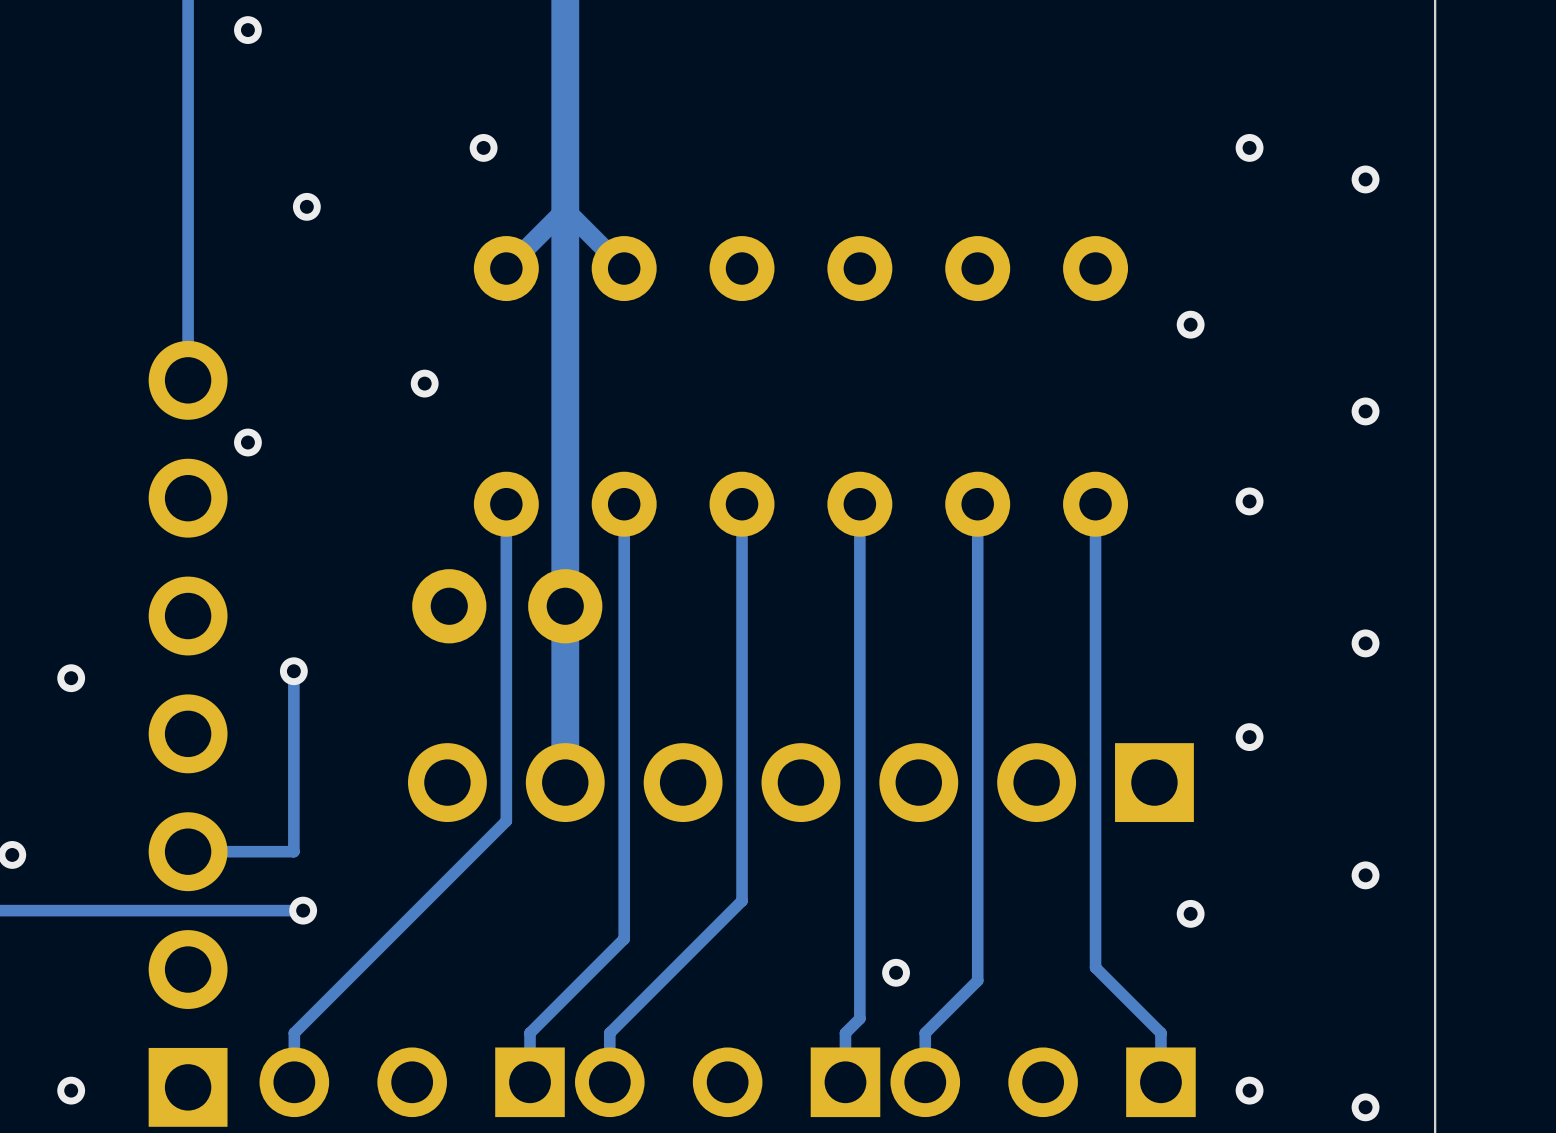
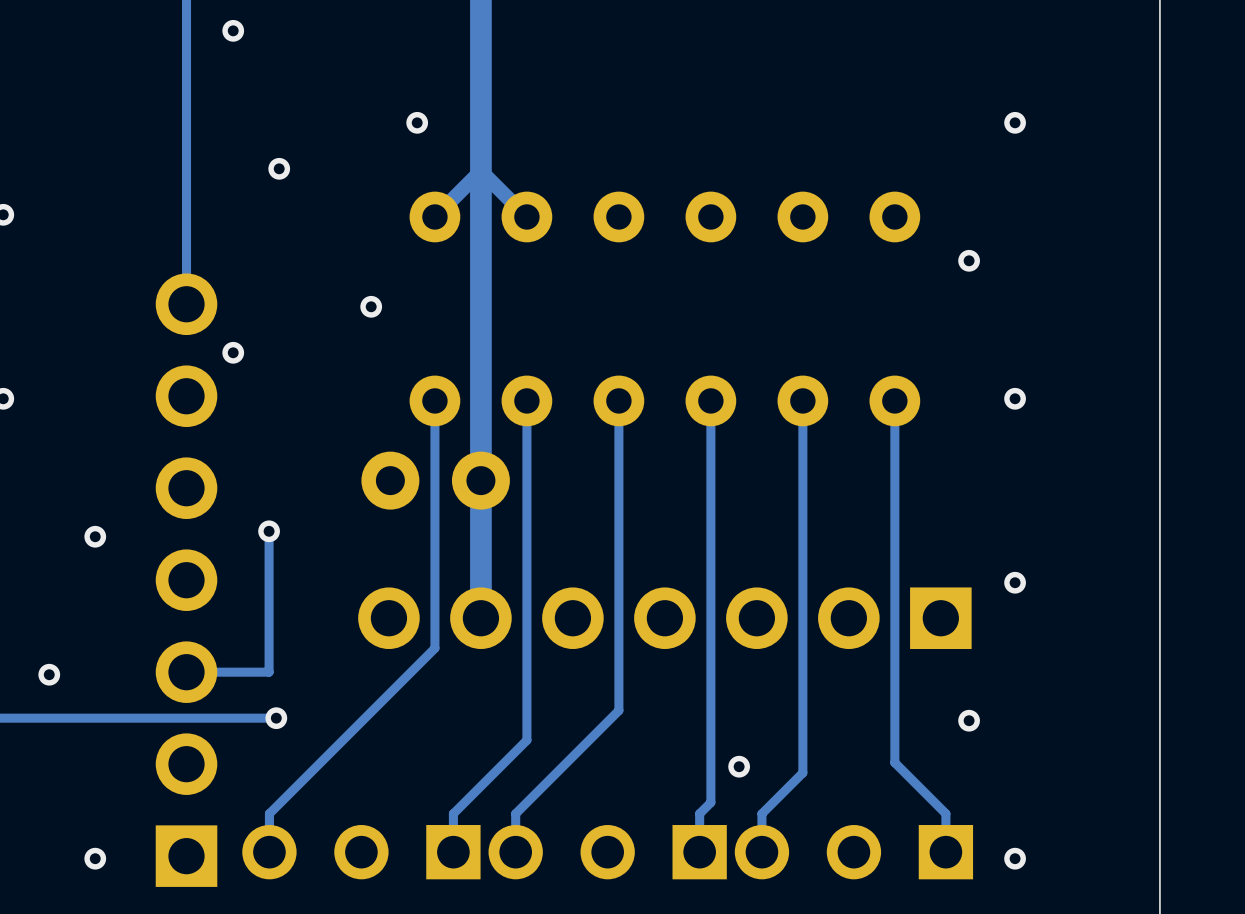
via: (1365, 179) -> none
via: (1365, 411) -> none
via: (1365, 643) -> none
via: (1365, 875) -> none
via: (1365, 1107) -> none

